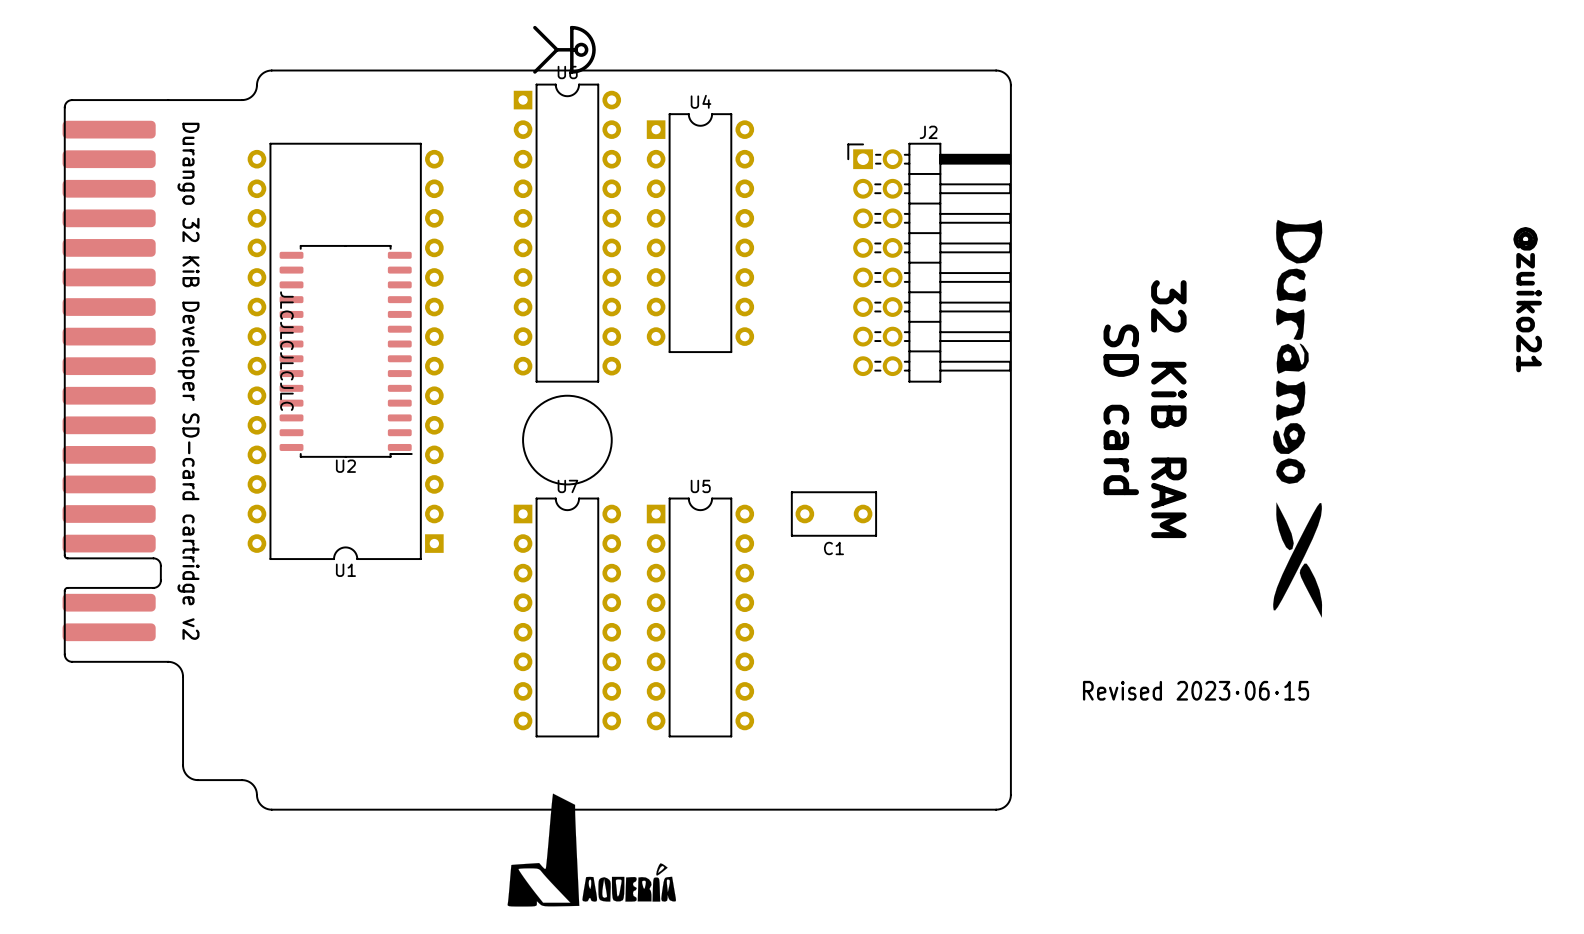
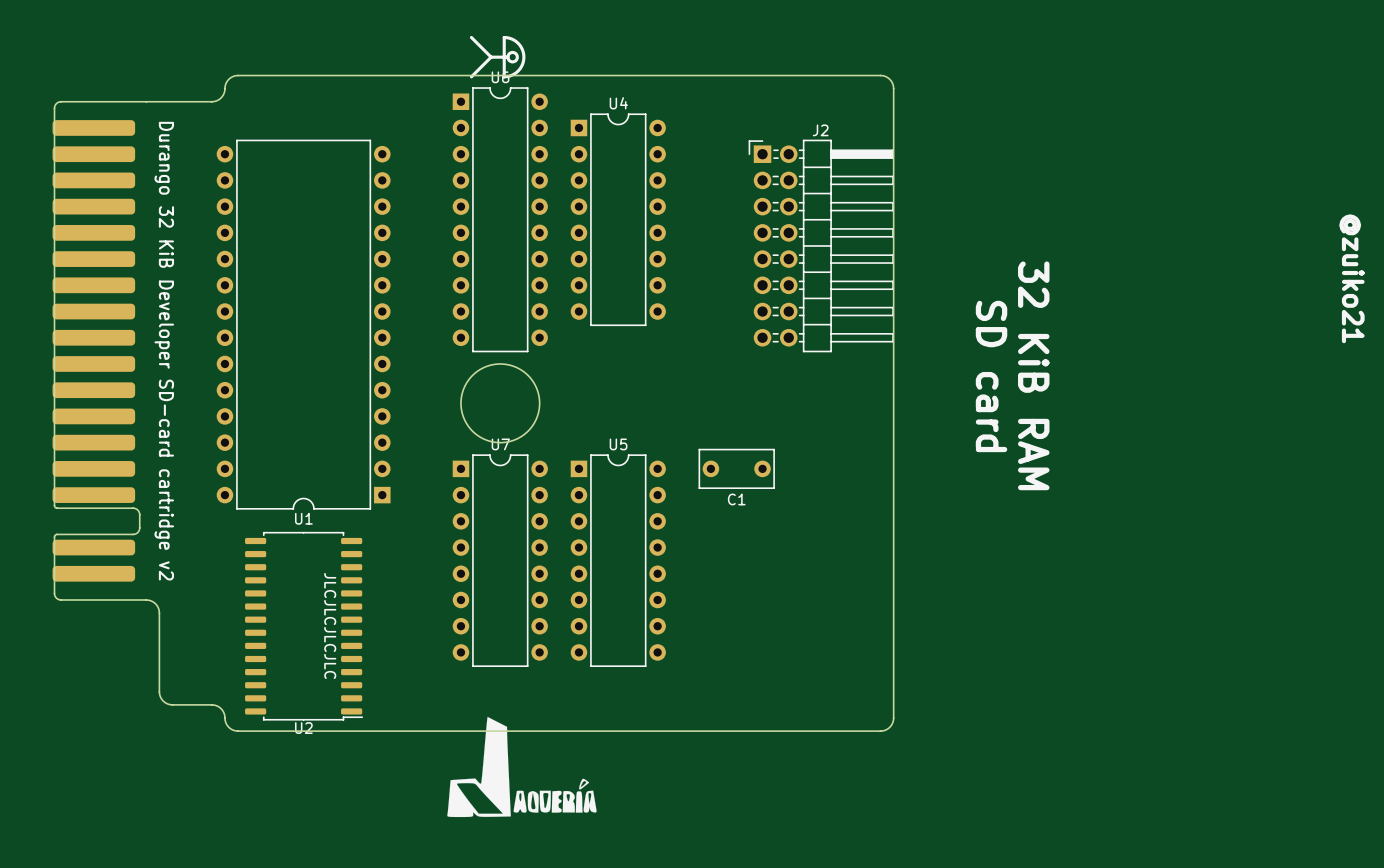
drawing: [1273, 219, 1323, 618] -> none
text: JLCJLCJLCJLC (286, 351) -> none
U2 position: (346, 351) -> (303, 626)
text: Revised 2023·06·15 (1196, 690) -> none
text: none -> JLCJLCJLCJLC (330, 625)

